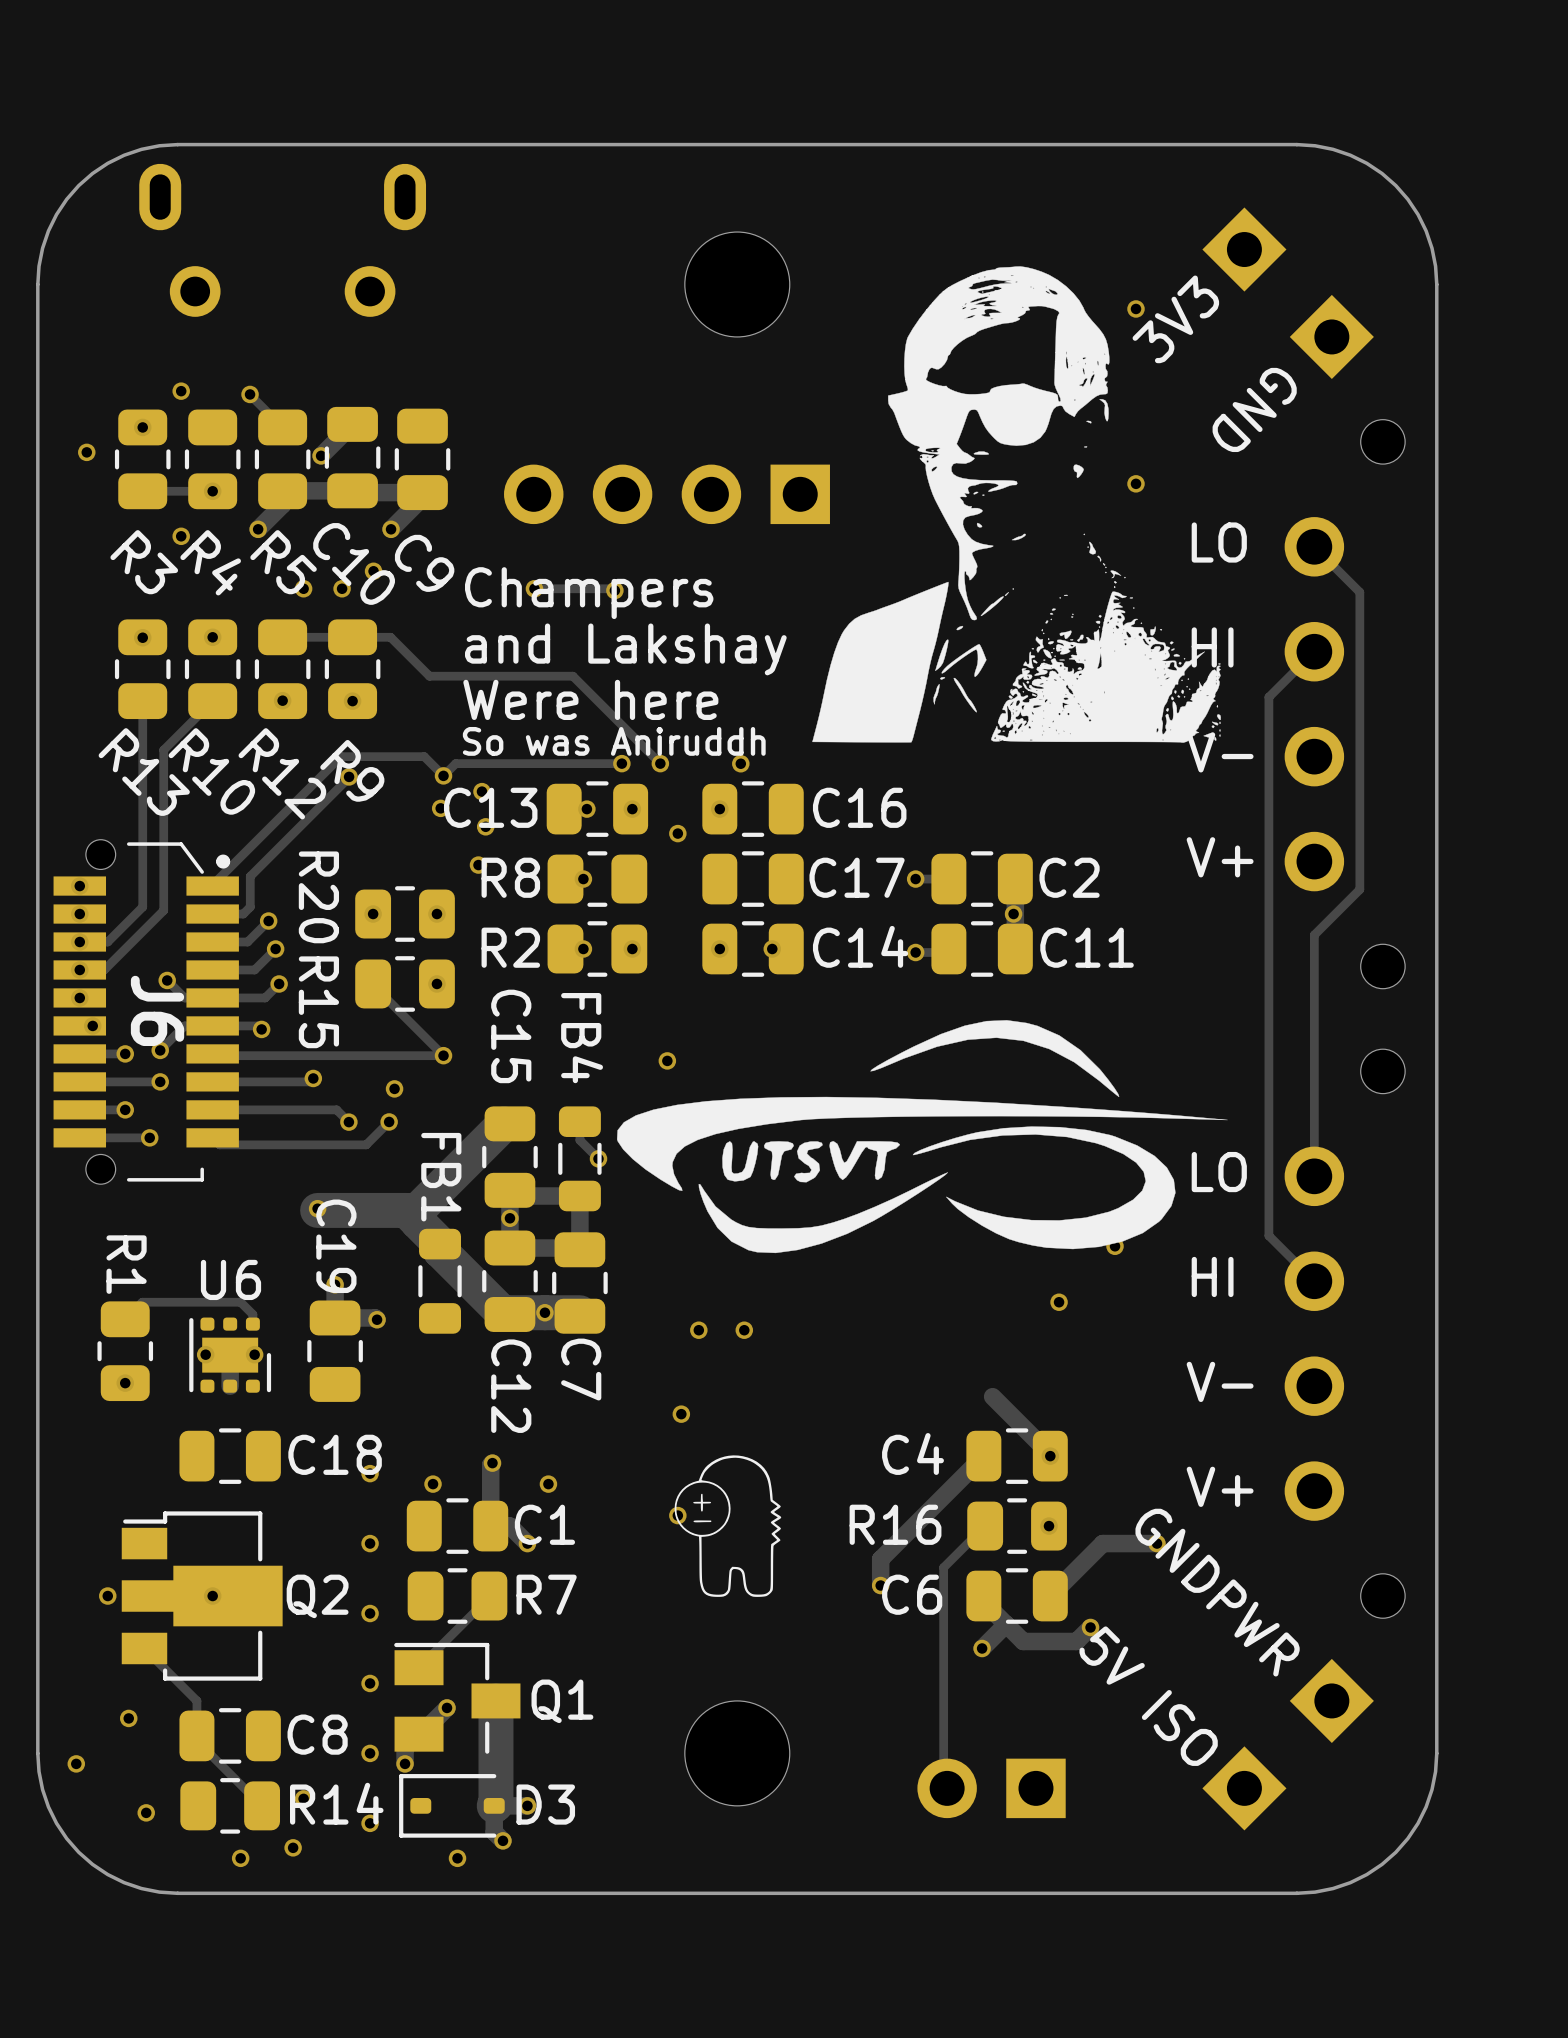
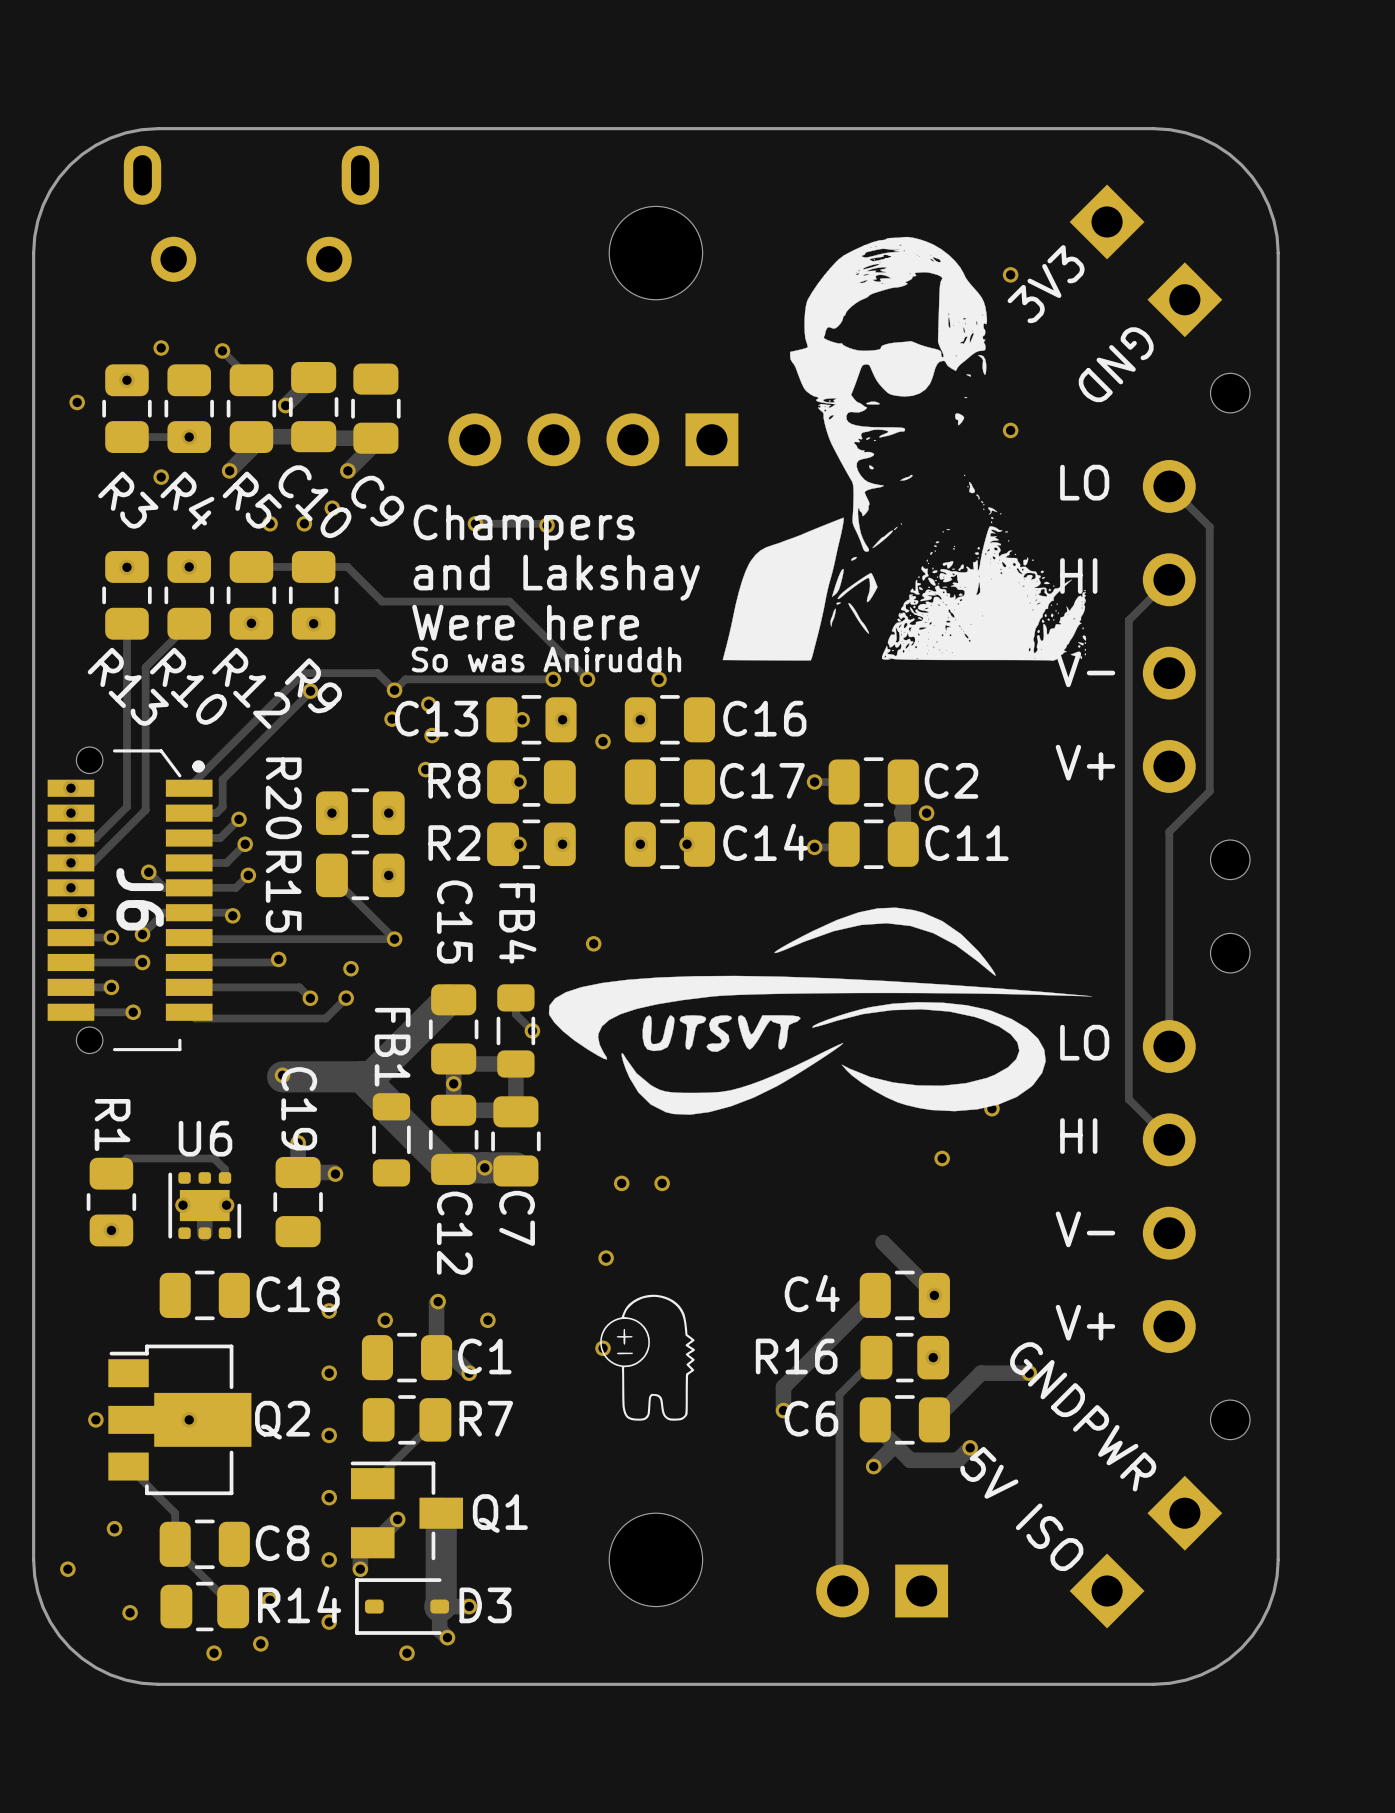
via position: (1013, 914) -> (926, 813)

